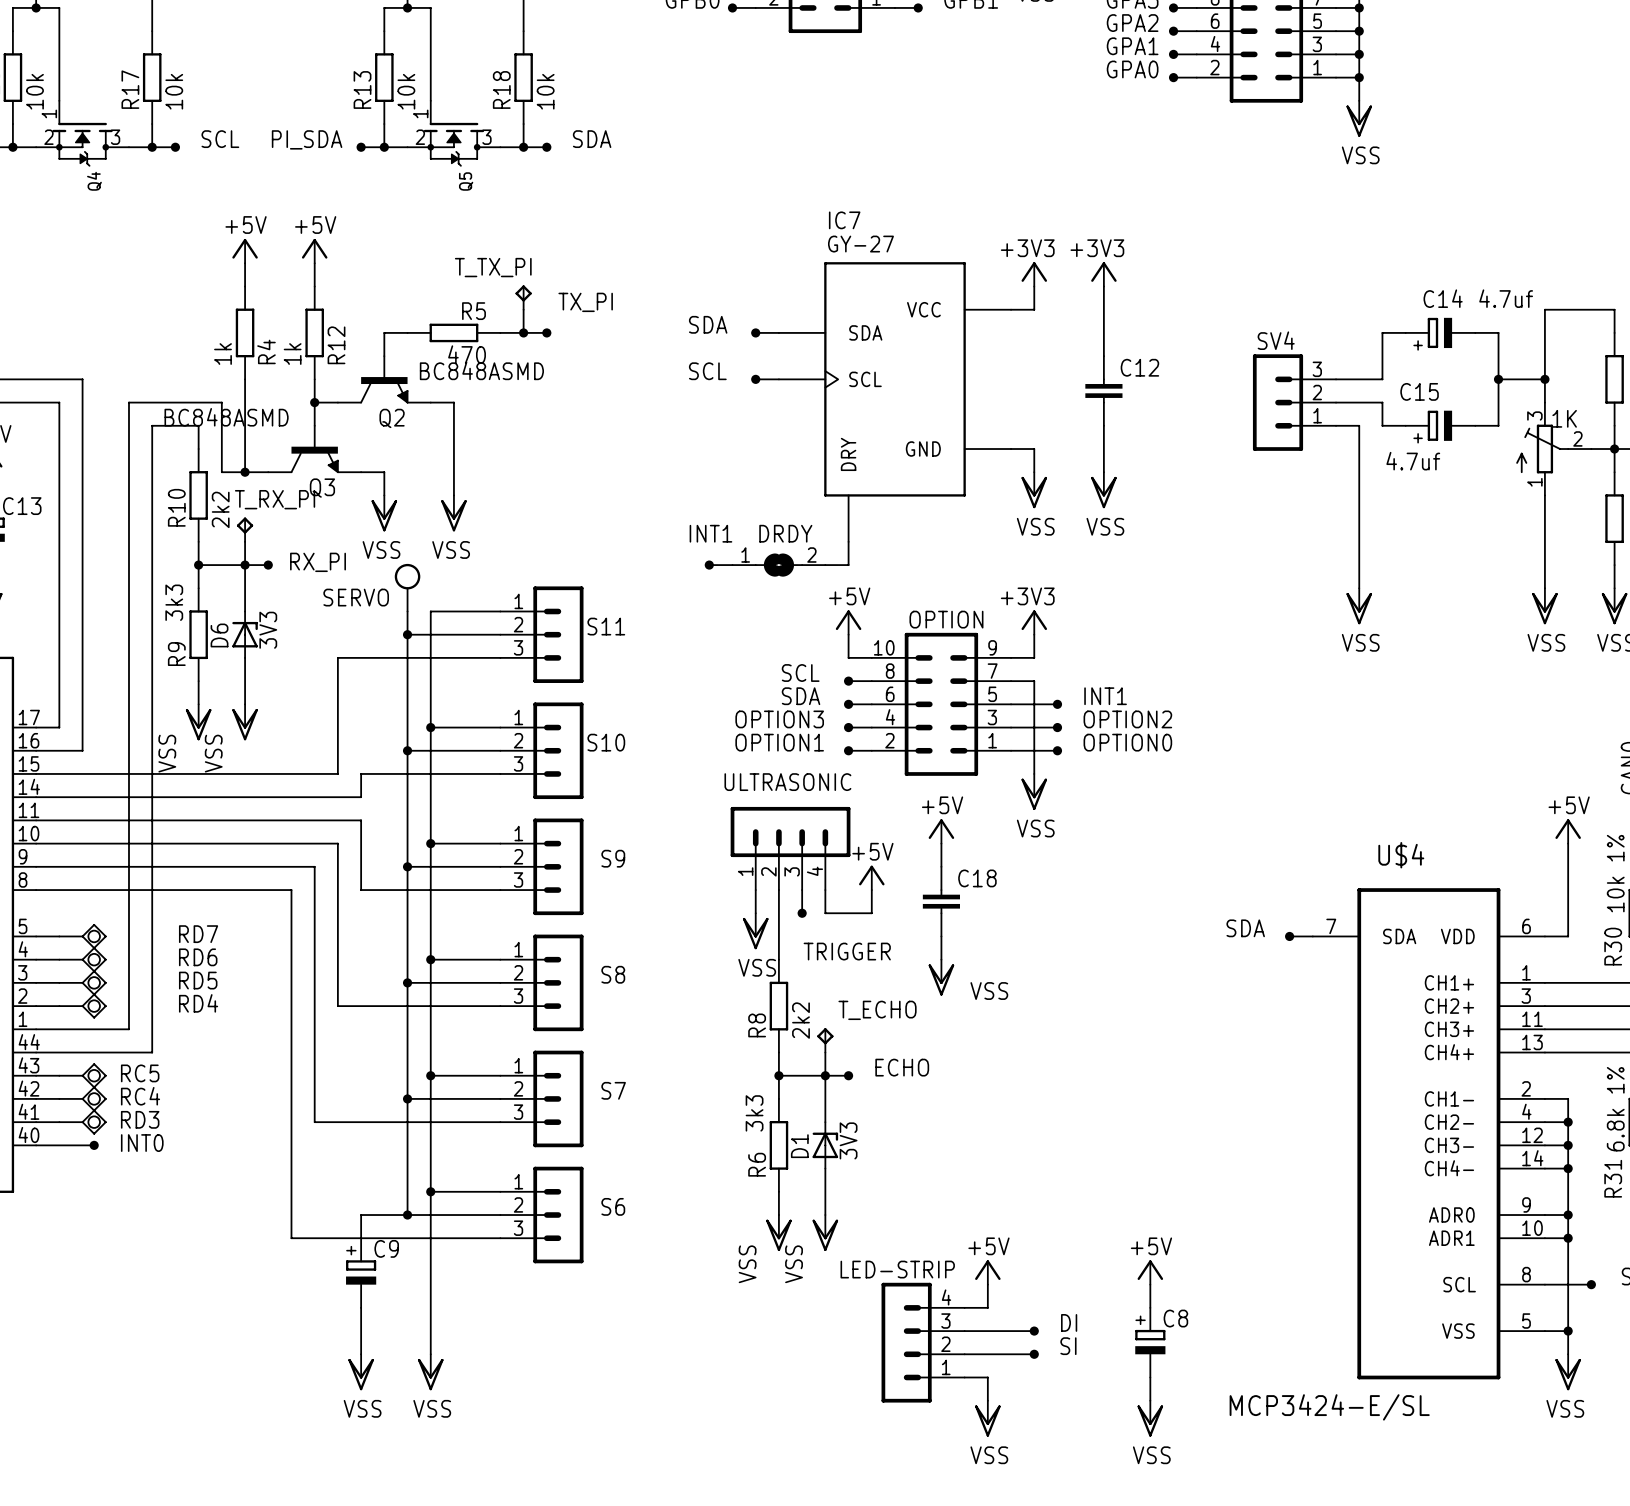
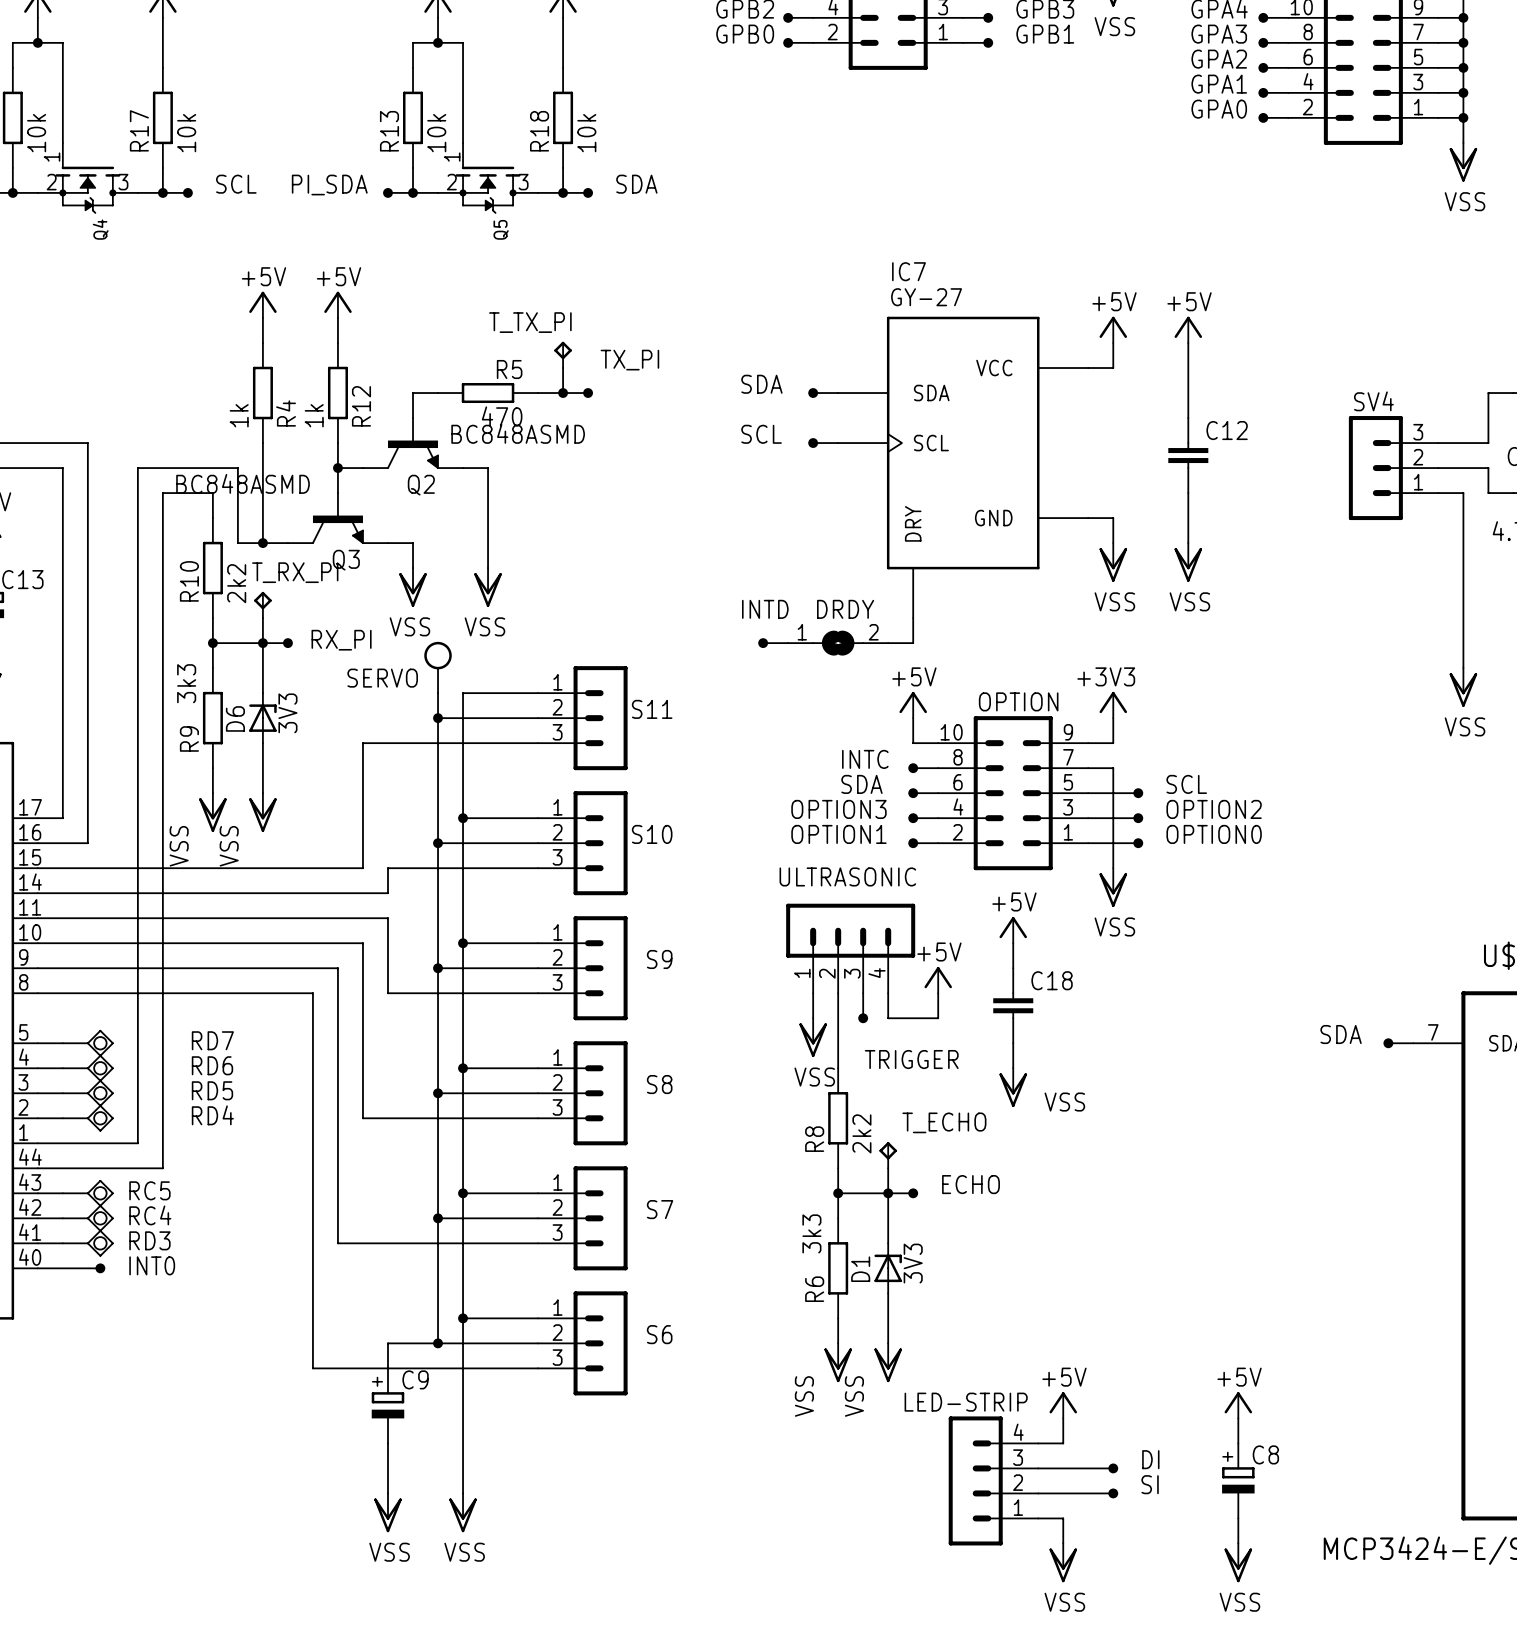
power symbol: +3V3 (1034, 274) -> +5V (1113, 329)
power symbol: +3V3 (1103, 274) -> +5V (1188, 329)
label: INT1 (710, 533) -> INTD (765, 609)
label: SCL (800, 673) -> INTC (865, 759)
label: INT1 (1105, 696) -> SCL (1186, 784)

